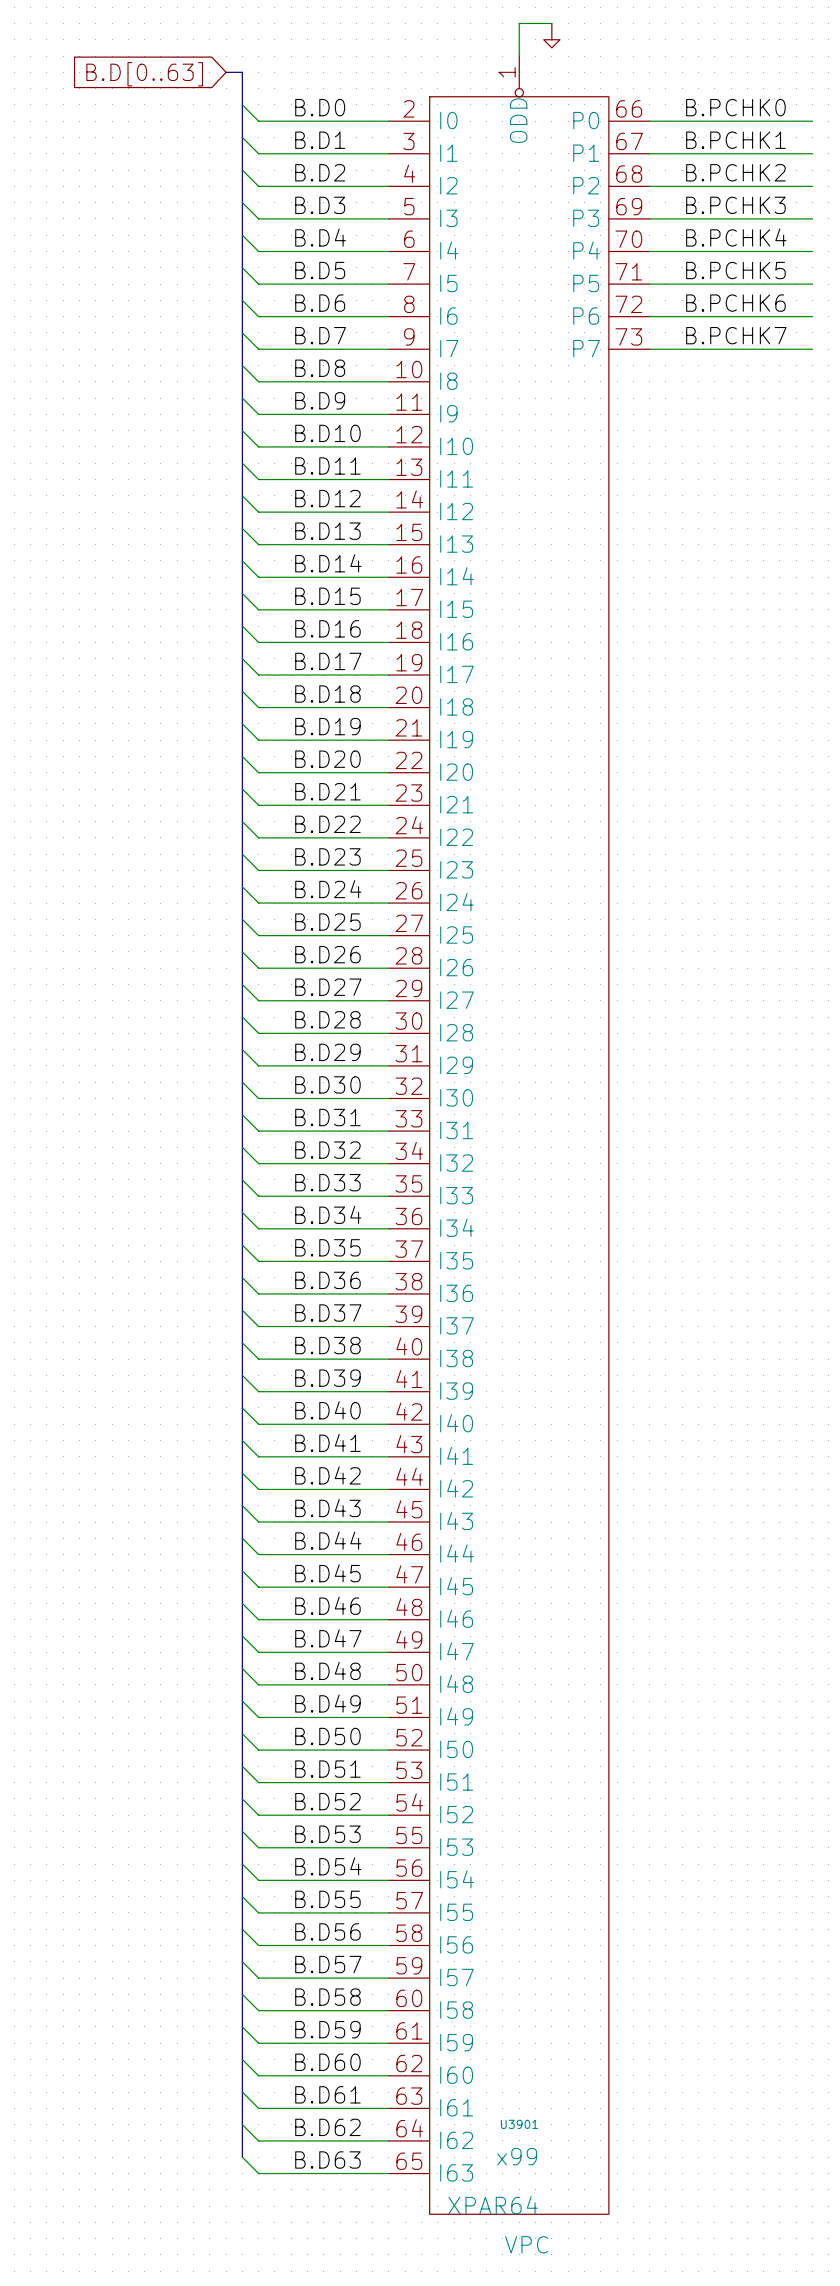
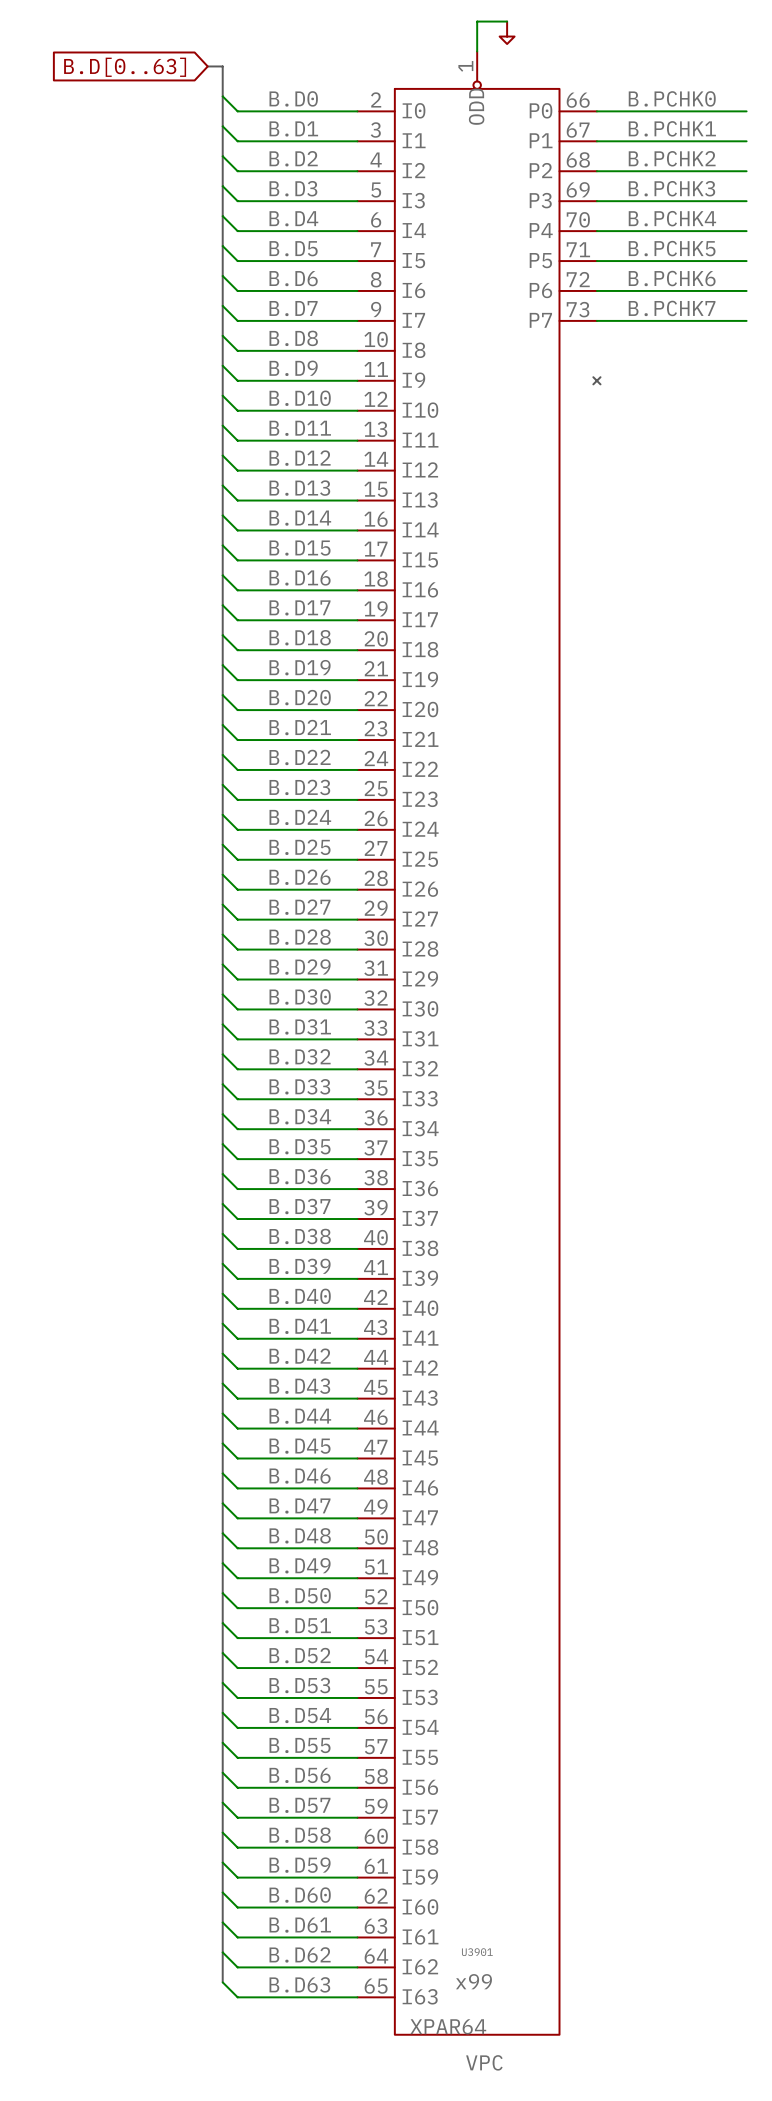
no-connect mark: none -> (596, 380)

